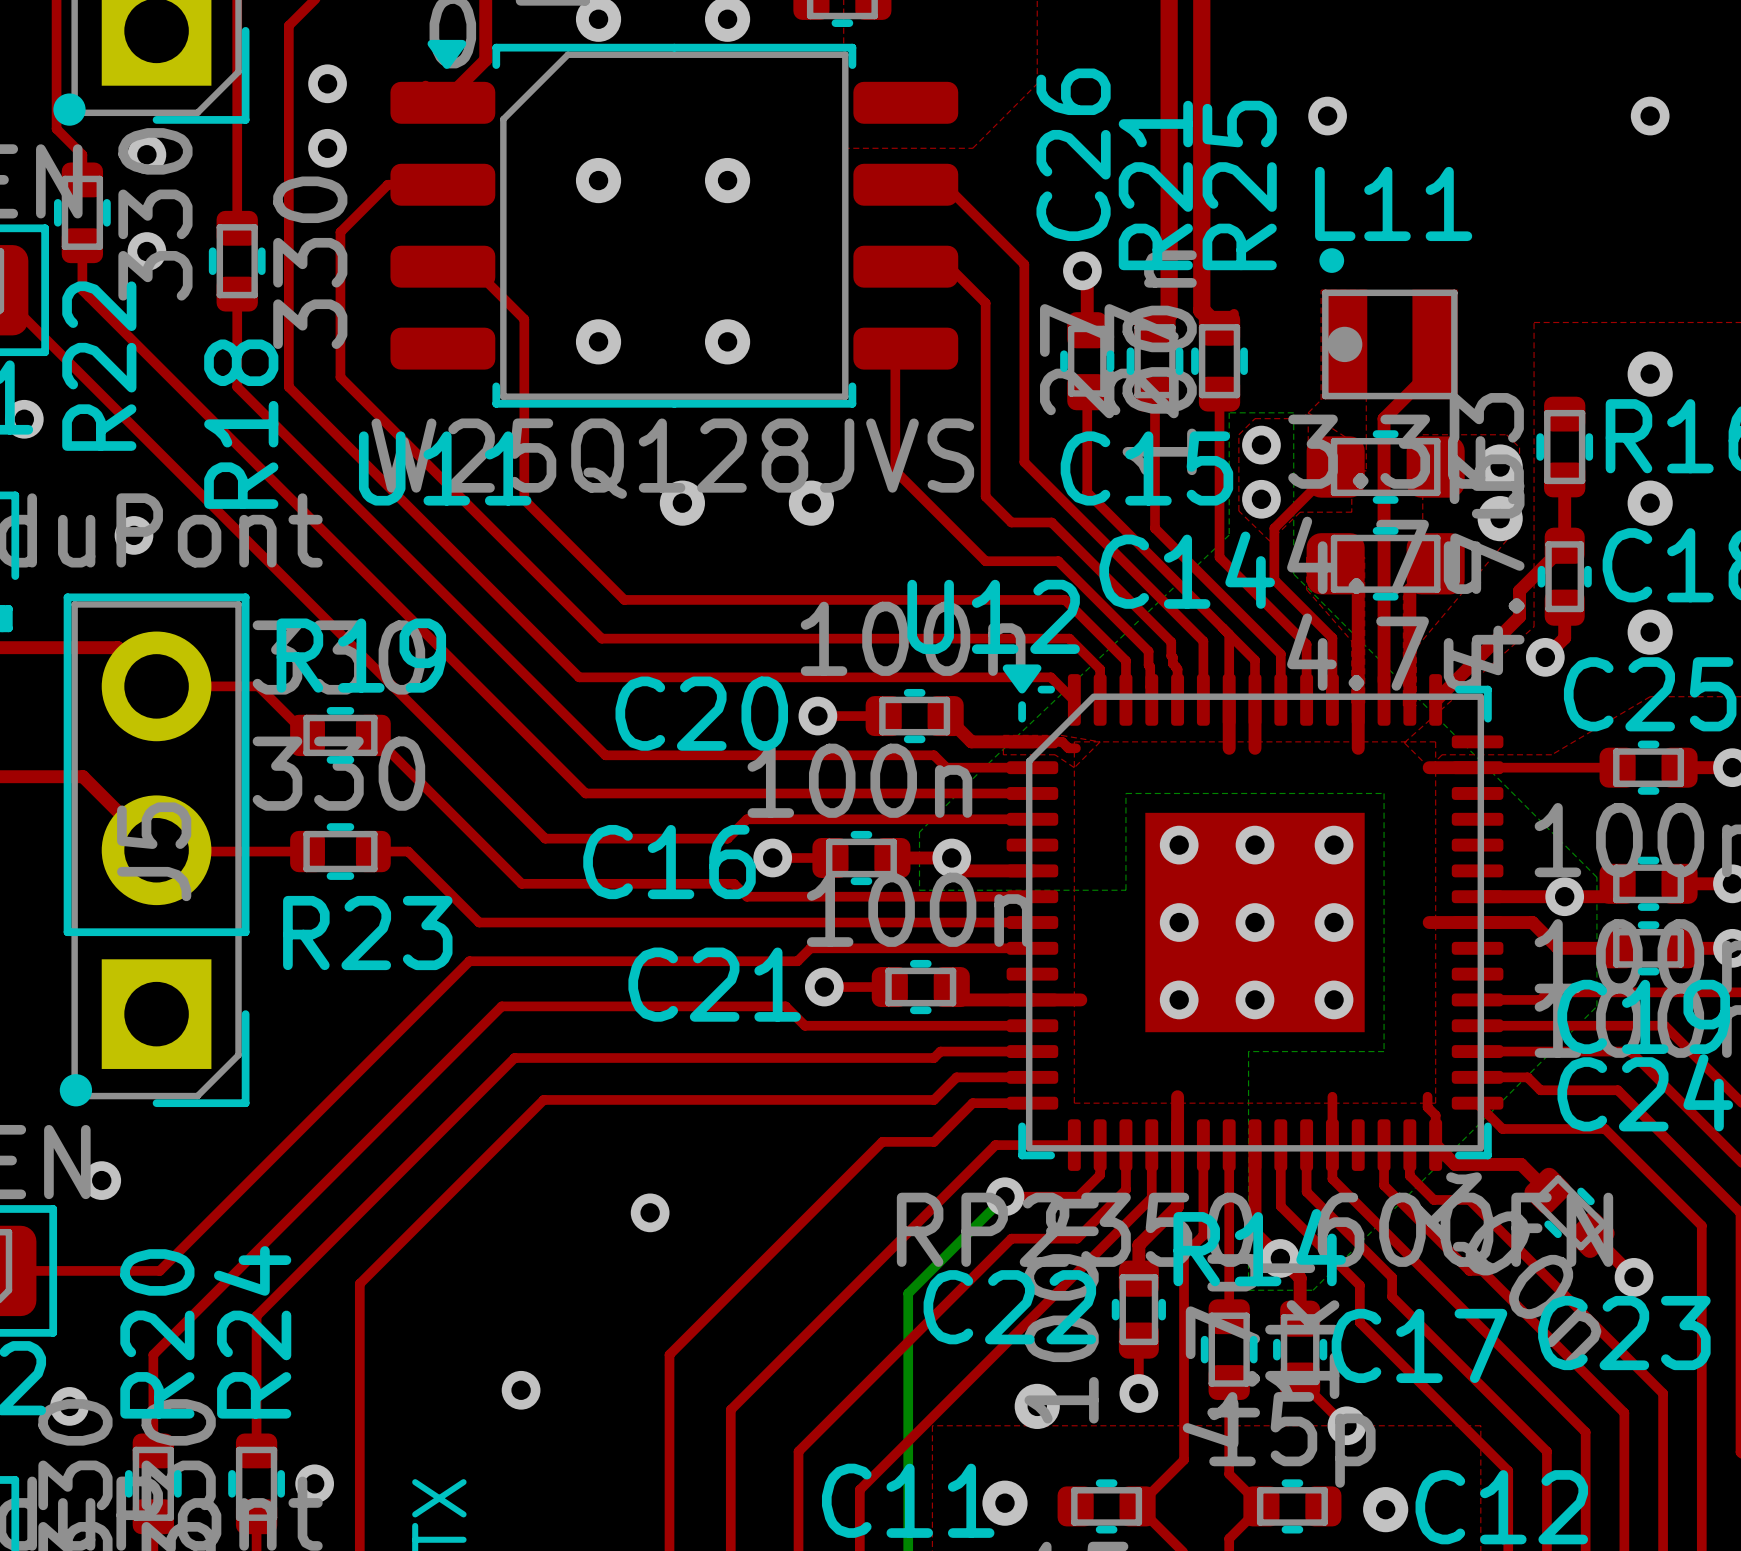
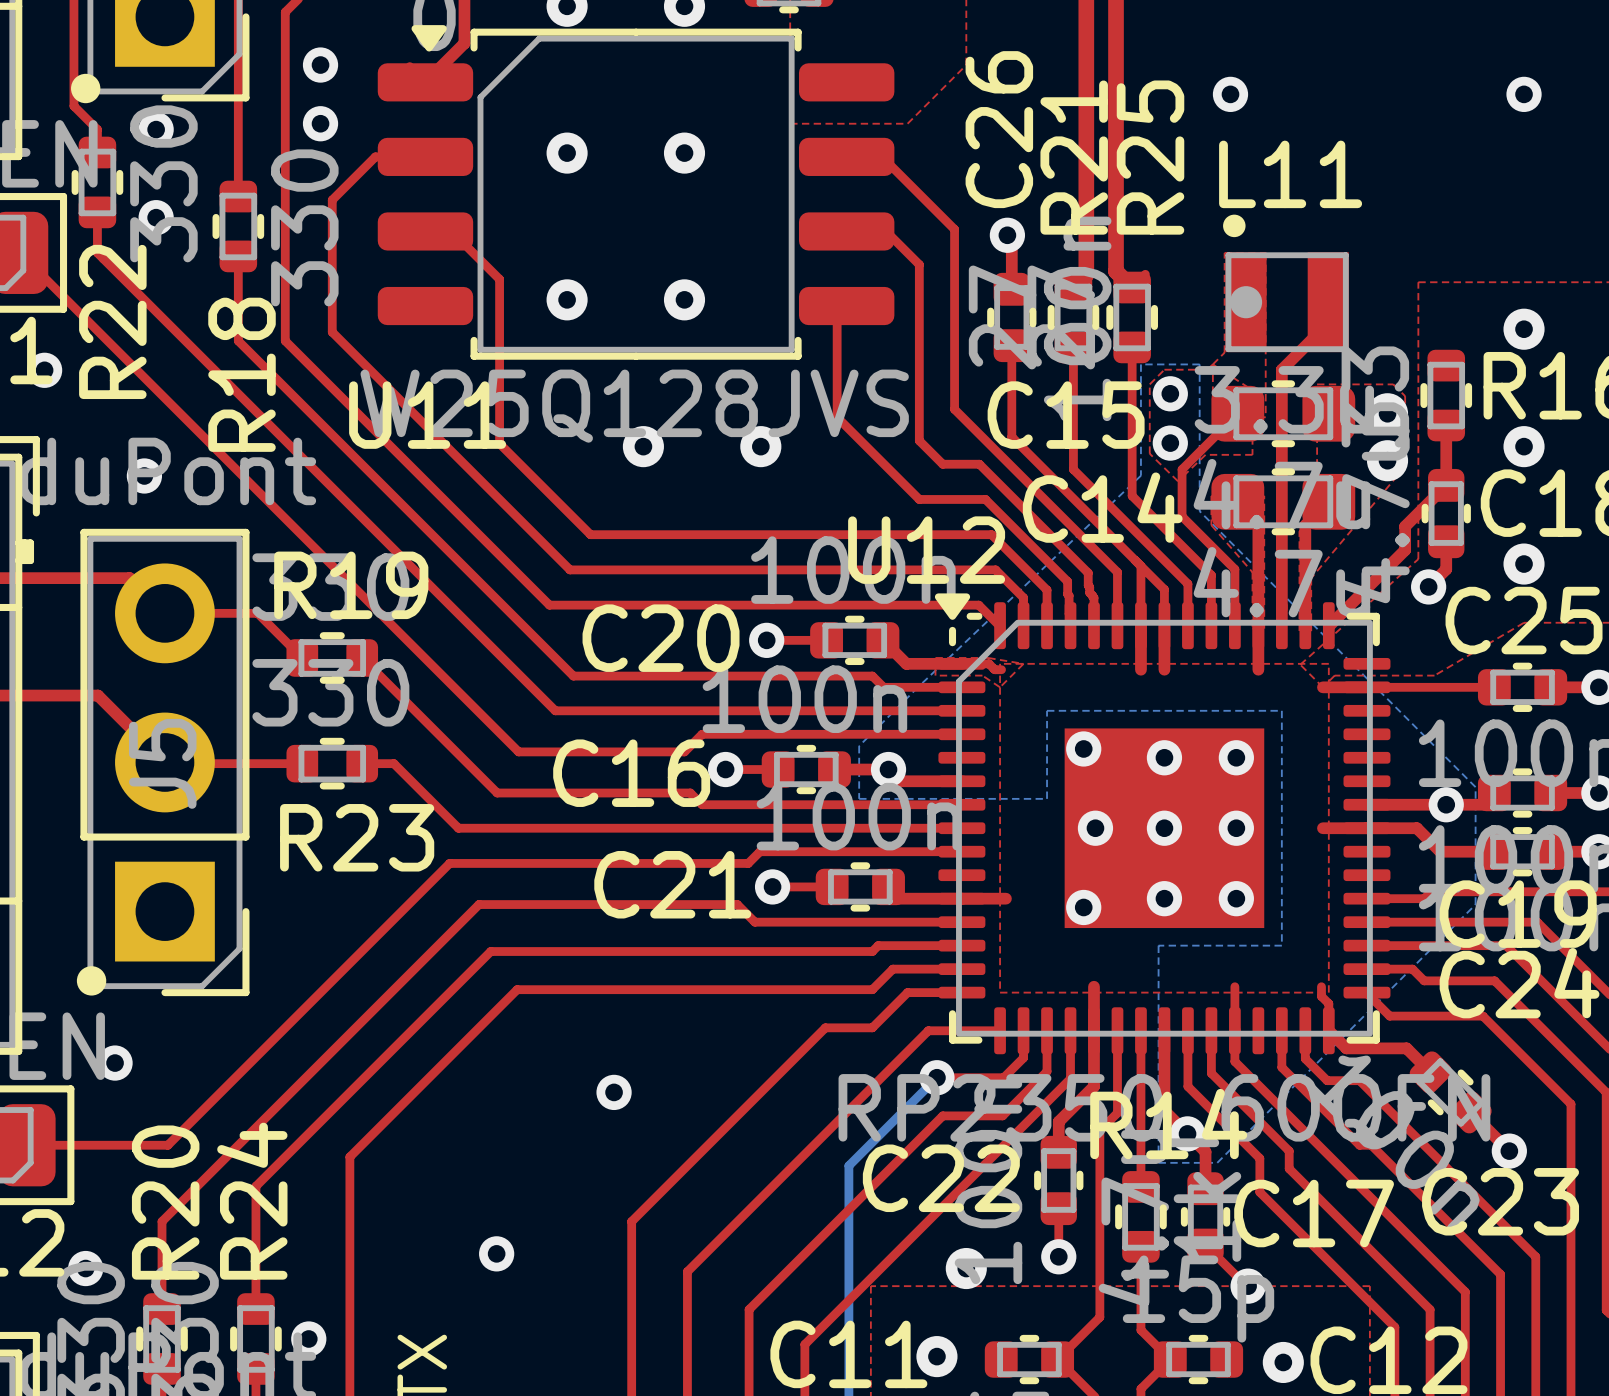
via position: (1179, 845) -> (1083, 748)
via position: (1179, 999) -> (1083, 907)

